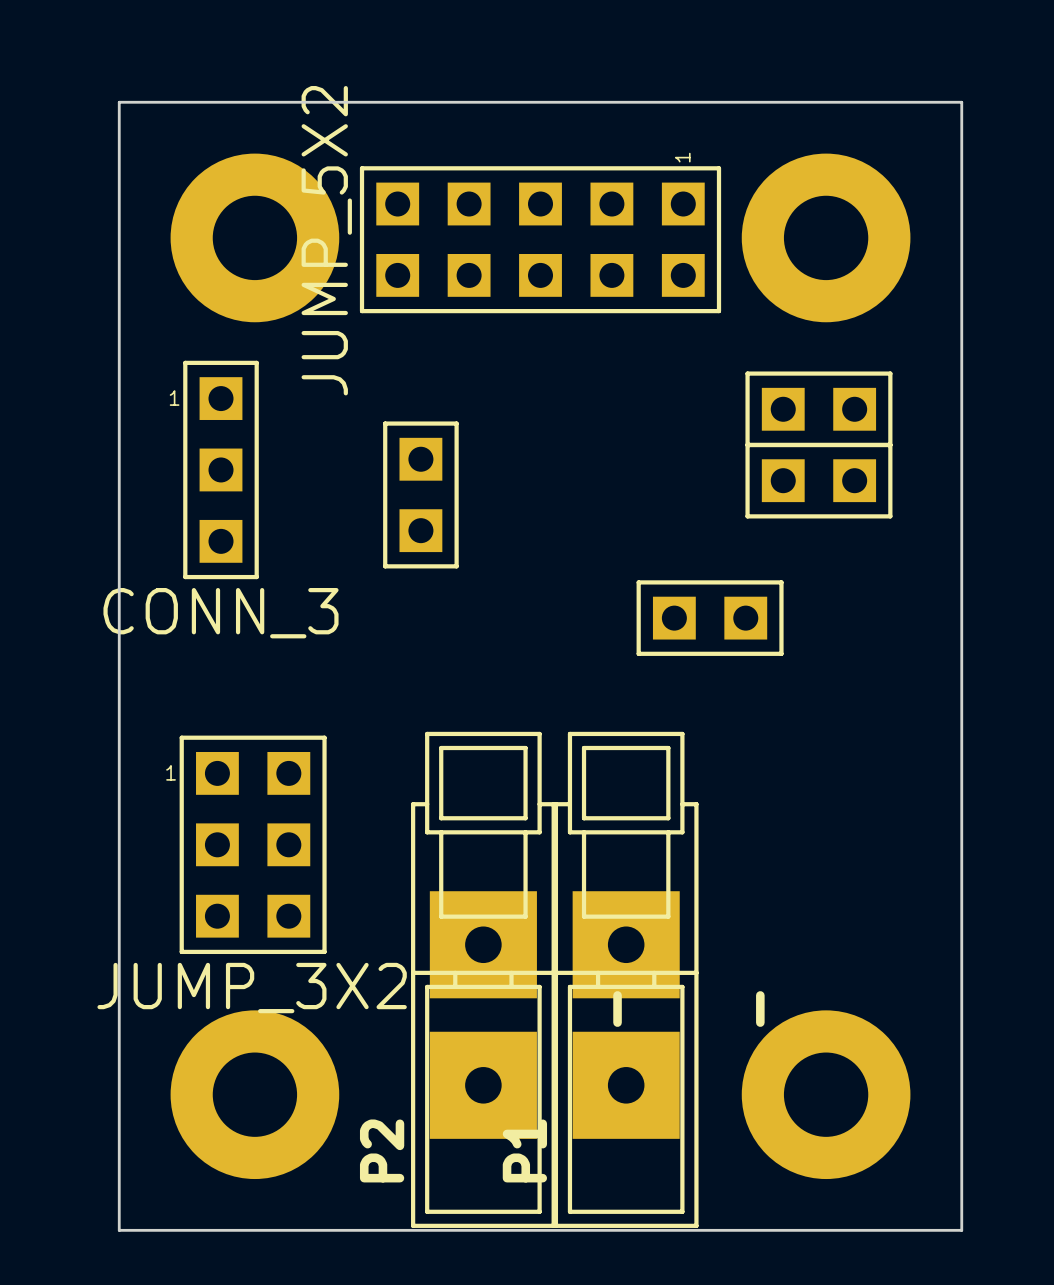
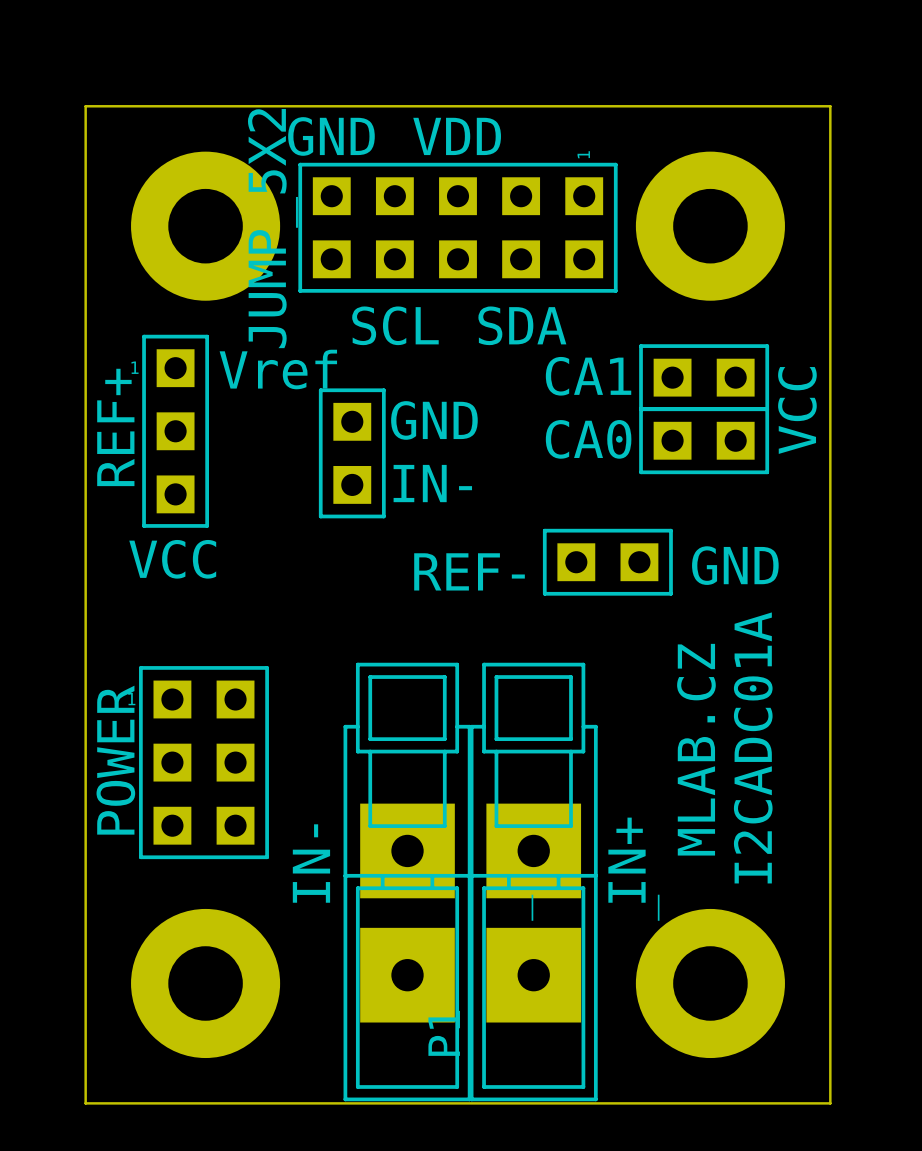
text: none -> GND (331, 136)
text: none -> VDD (457, 136)
text: none -> SCL (395, 325)
text: none -> SDA (522, 325)
text: none -> Vref (278, 369)
text: none -> CA1 (588, 376)
text: none -> VCC (797, 410)
text: none -> GND (434, 420)
text: none -> REF+ (115, 427)
text: none -> CA0 (588, 439)
text: none -> IN- (432, 483)
part value: CONN_3 (221, 613) -> none
text: none -> VCC (172, 559)
text: none -> GND (735, 565)
text: none -> REF- (469, 571)
text: none -> I2CADC01A (753, 747)
text: none -> MLAB.CZ (696, 749)
text: none -> POWER (115, 760)
text: none -> IN- (311, 863)
text: none -> IN+ (627, 860)
part value: JUMP_3X2 (252, 988) -> none
P2 name: P2 (382, 1150) -> none

